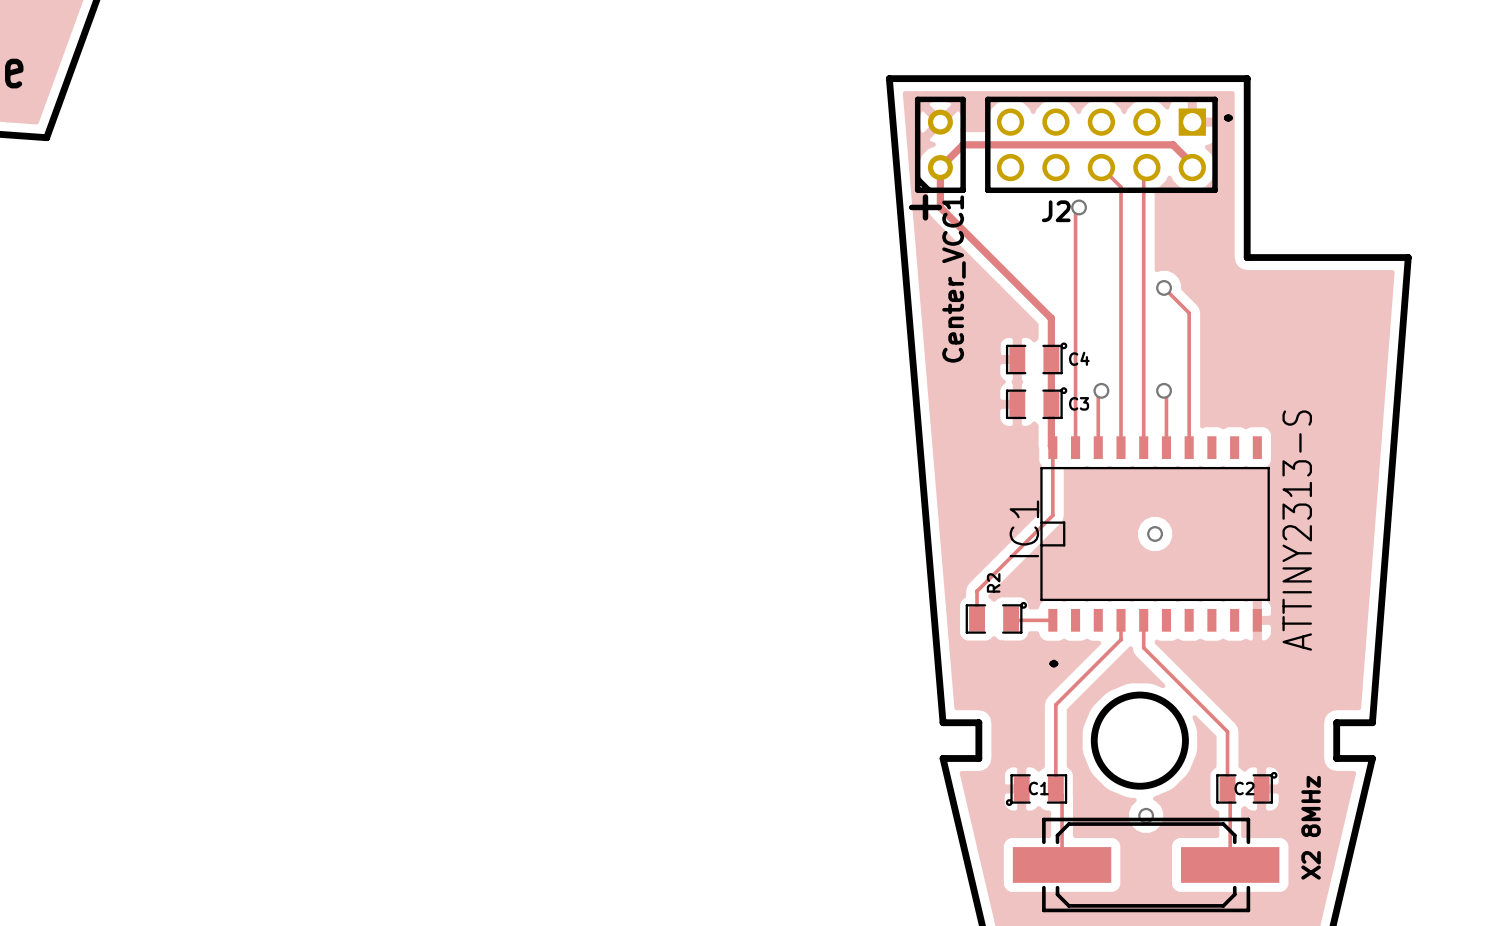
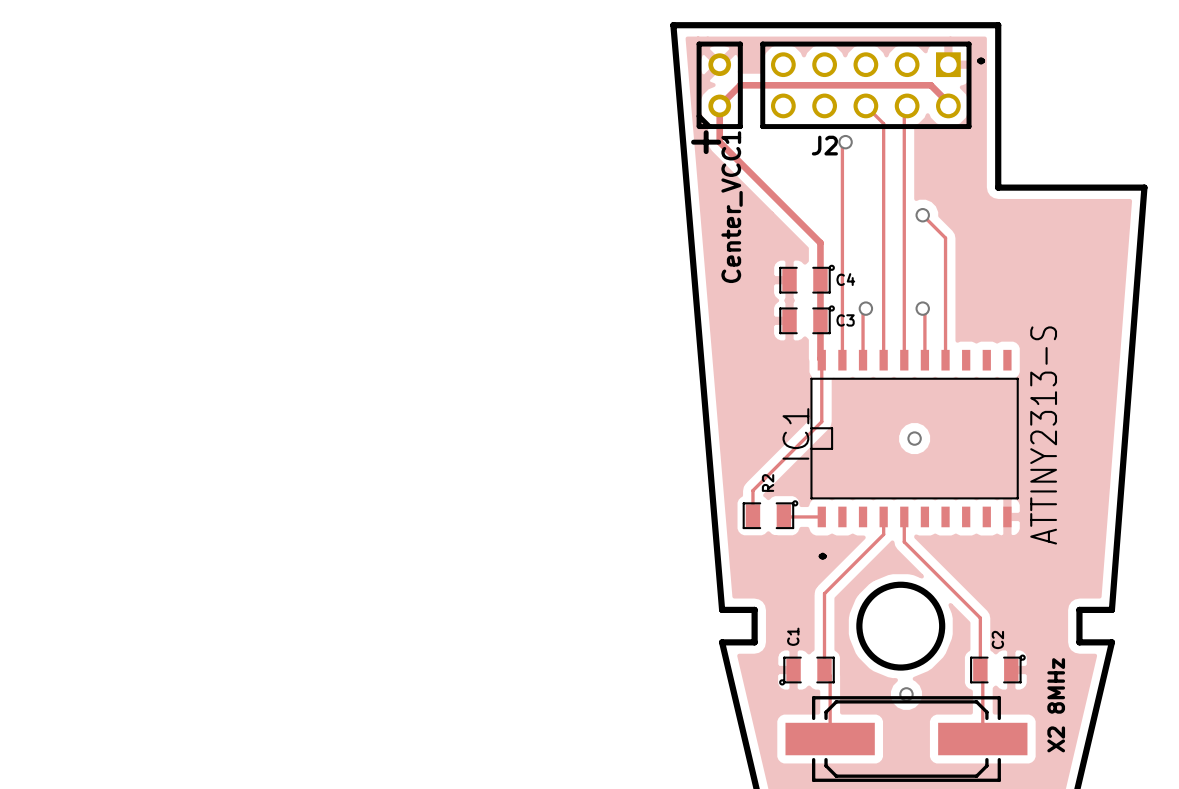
C1 name rotation: 0° (1038, 788) -> 90° counterclockwise (793, 636)
C1 name position: C1 (1038, 788) -> C1 (793, 636)
C2 name rotation: 0° (1244, 788) -> 90° counterclockwise (997, 639)
C2 name position: C2 (1244, 788) -> C2 (997, 639)

